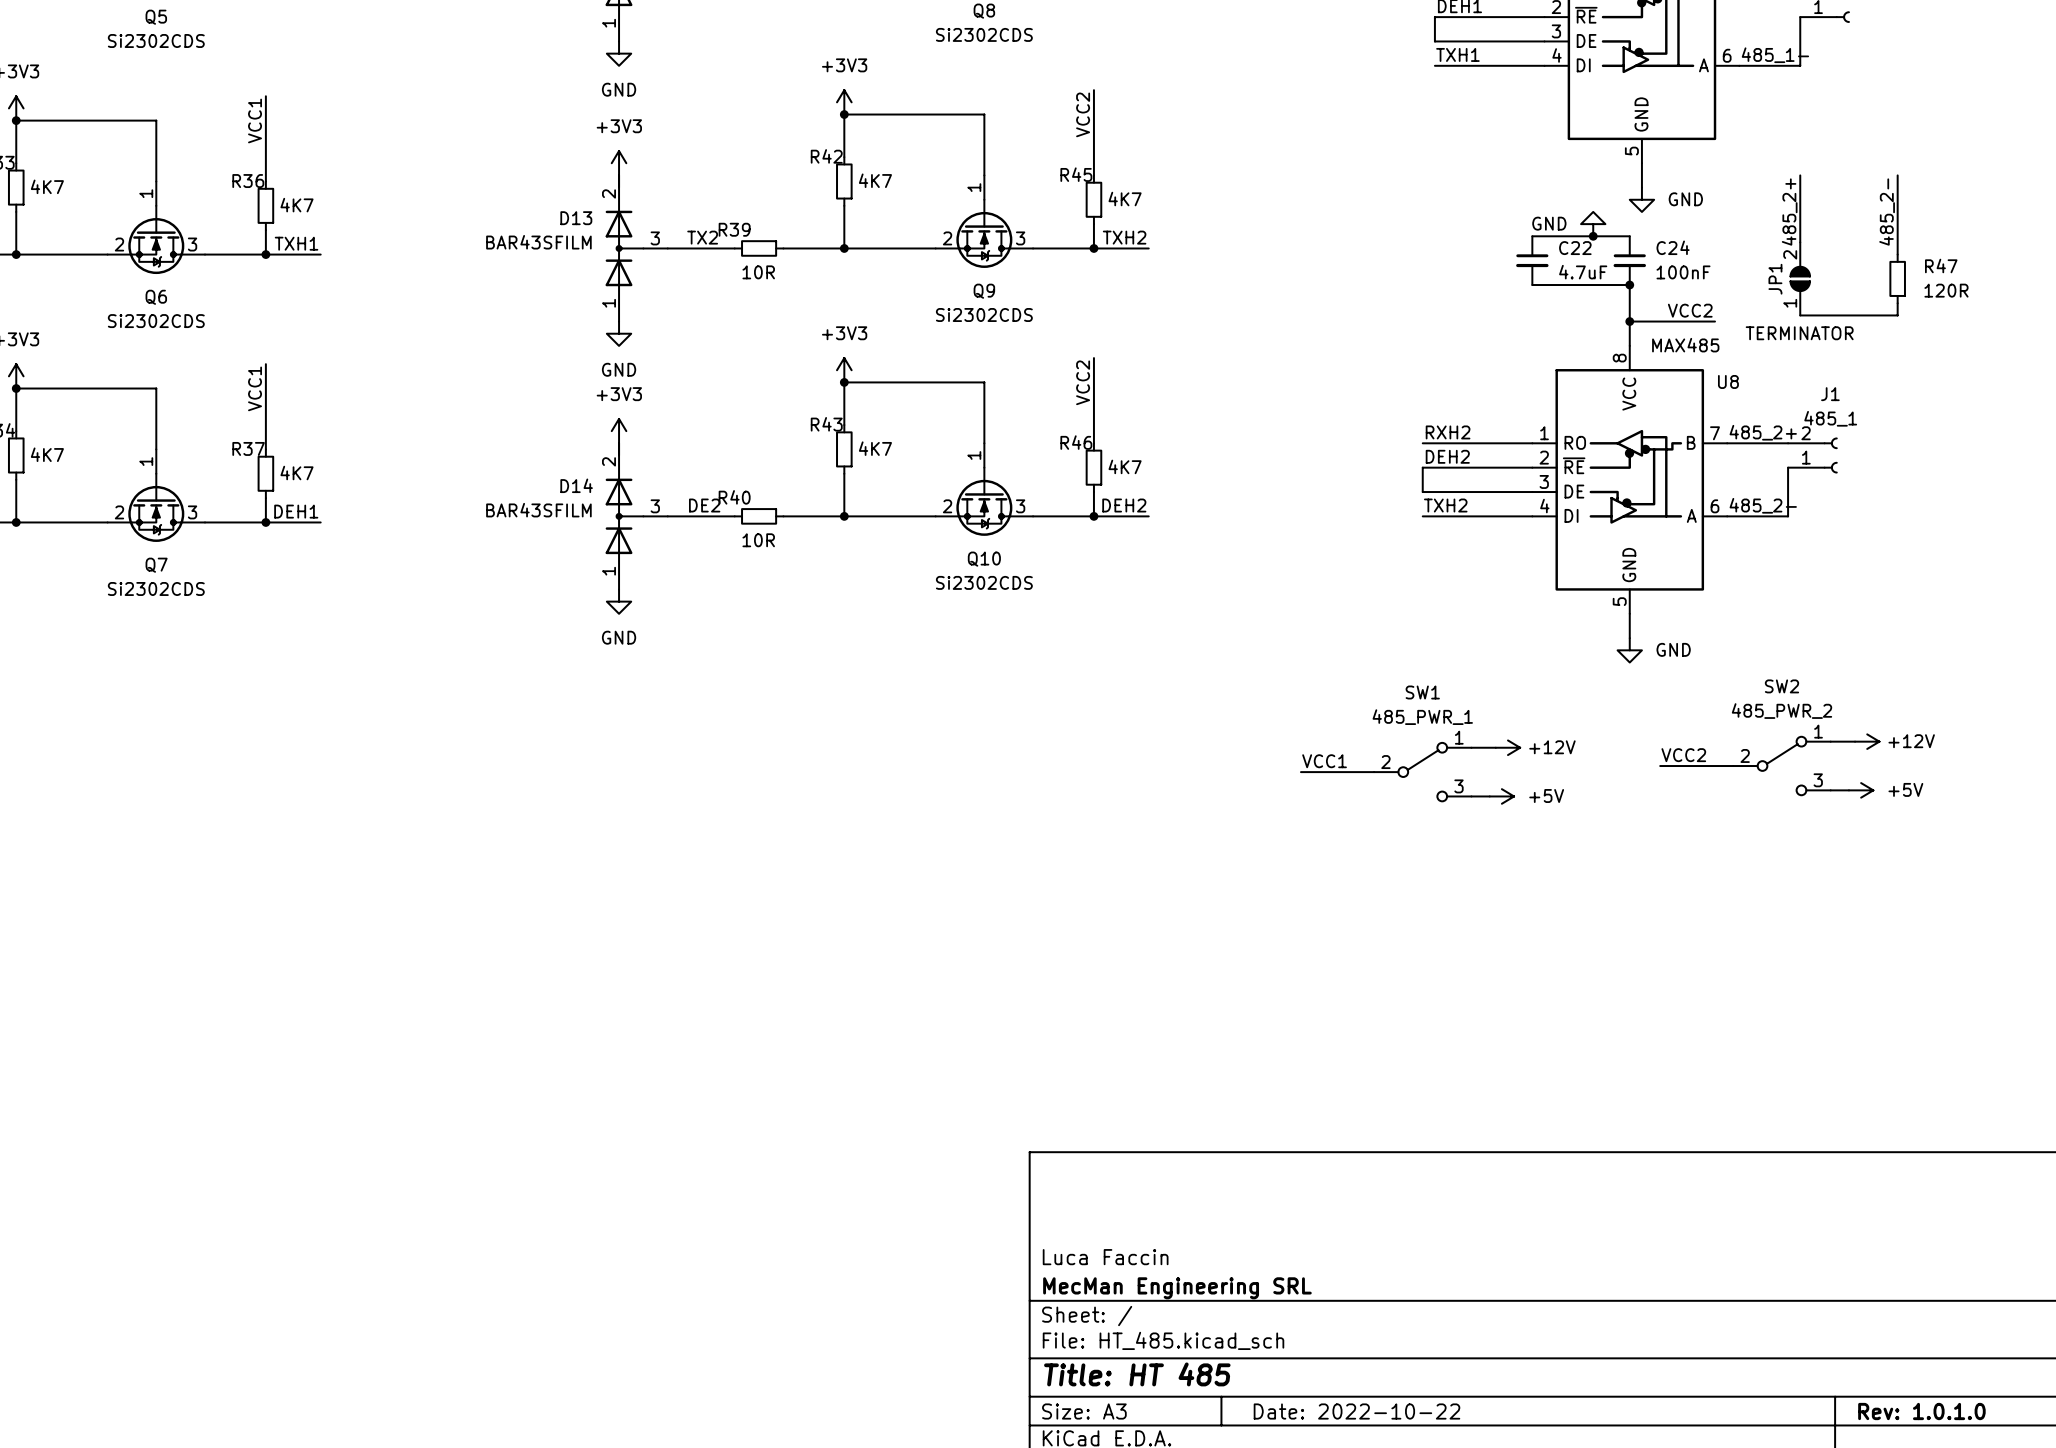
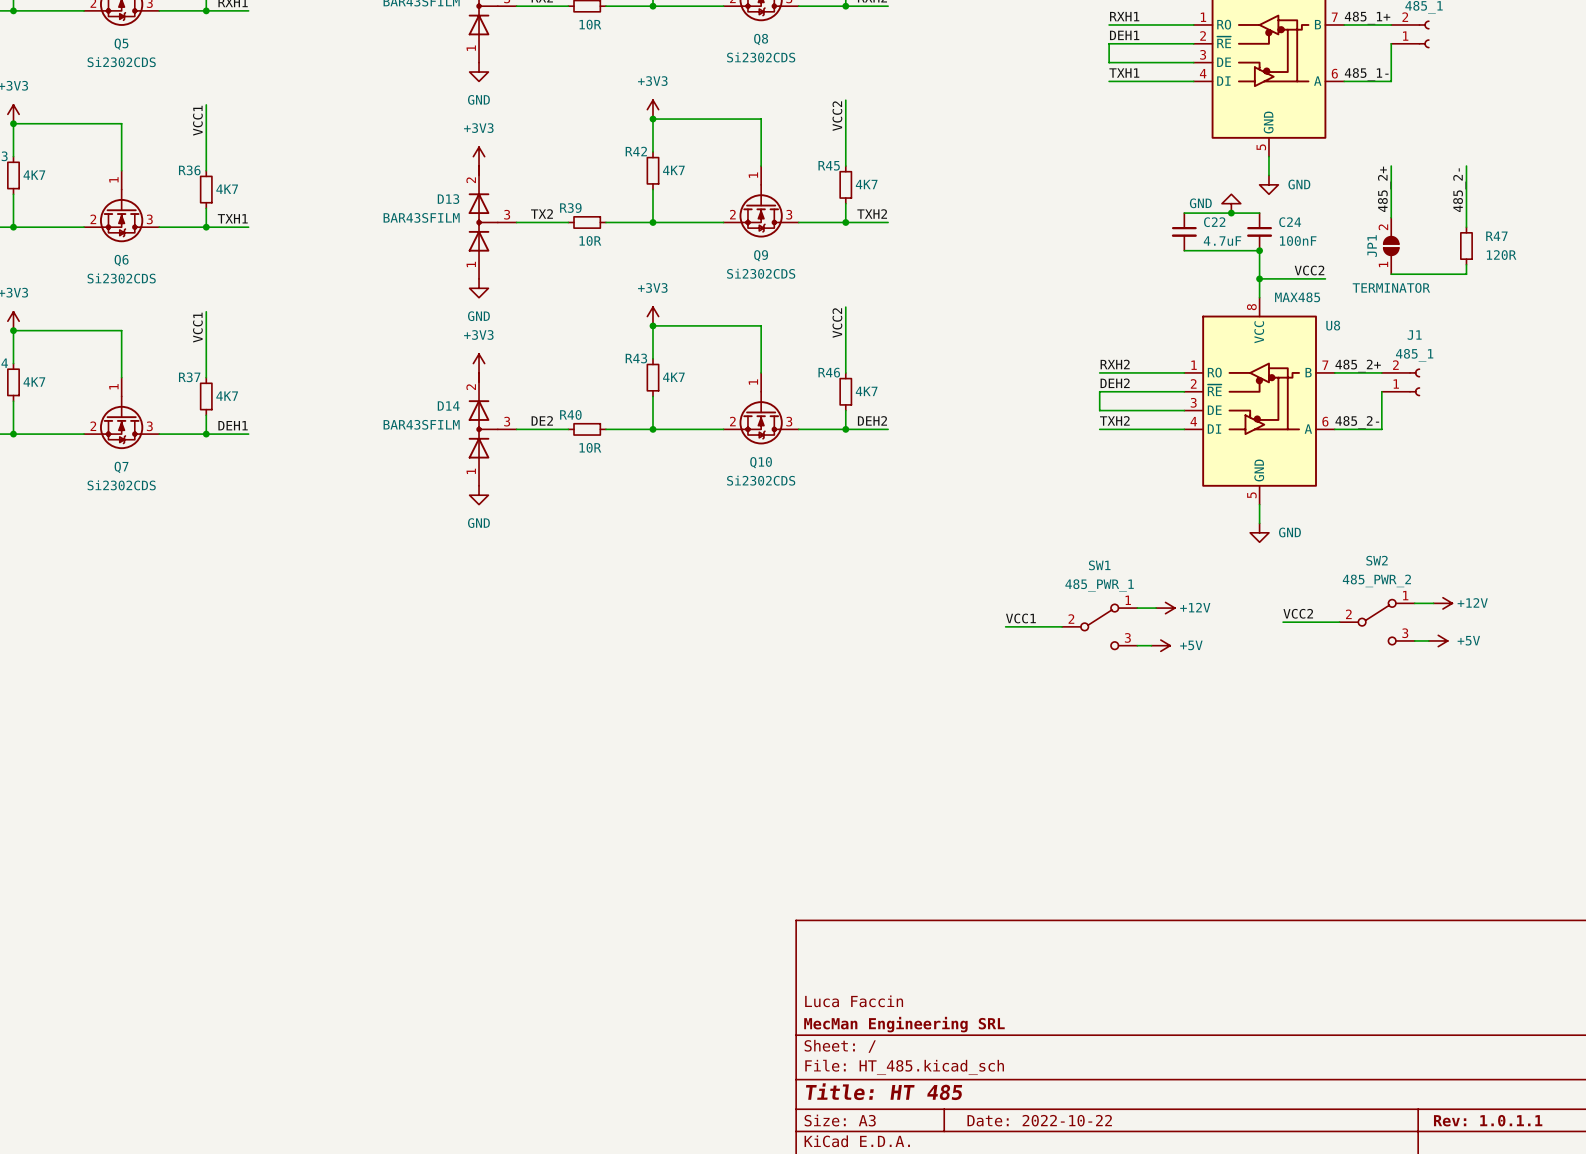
title block: Rev: 1.0.1.0 (1921, 1411) -> Rev: 1.0.1.1 (1488, 1120)

